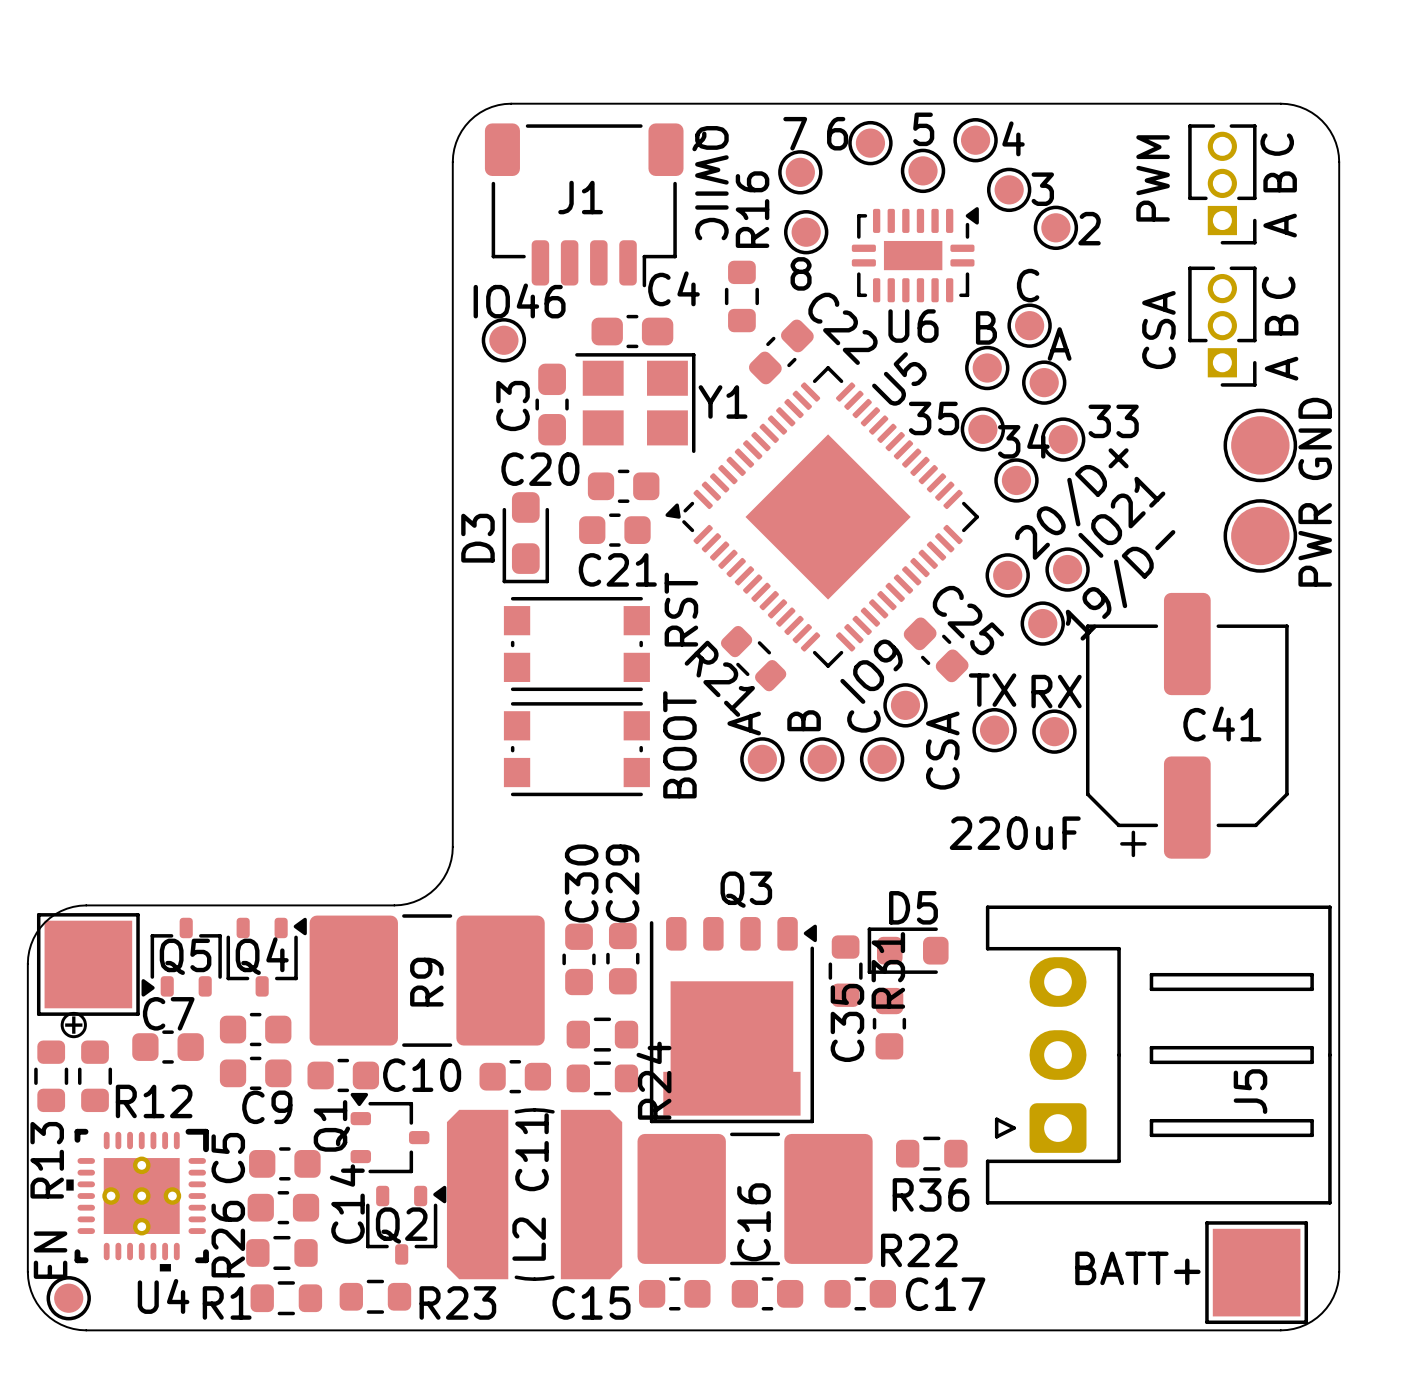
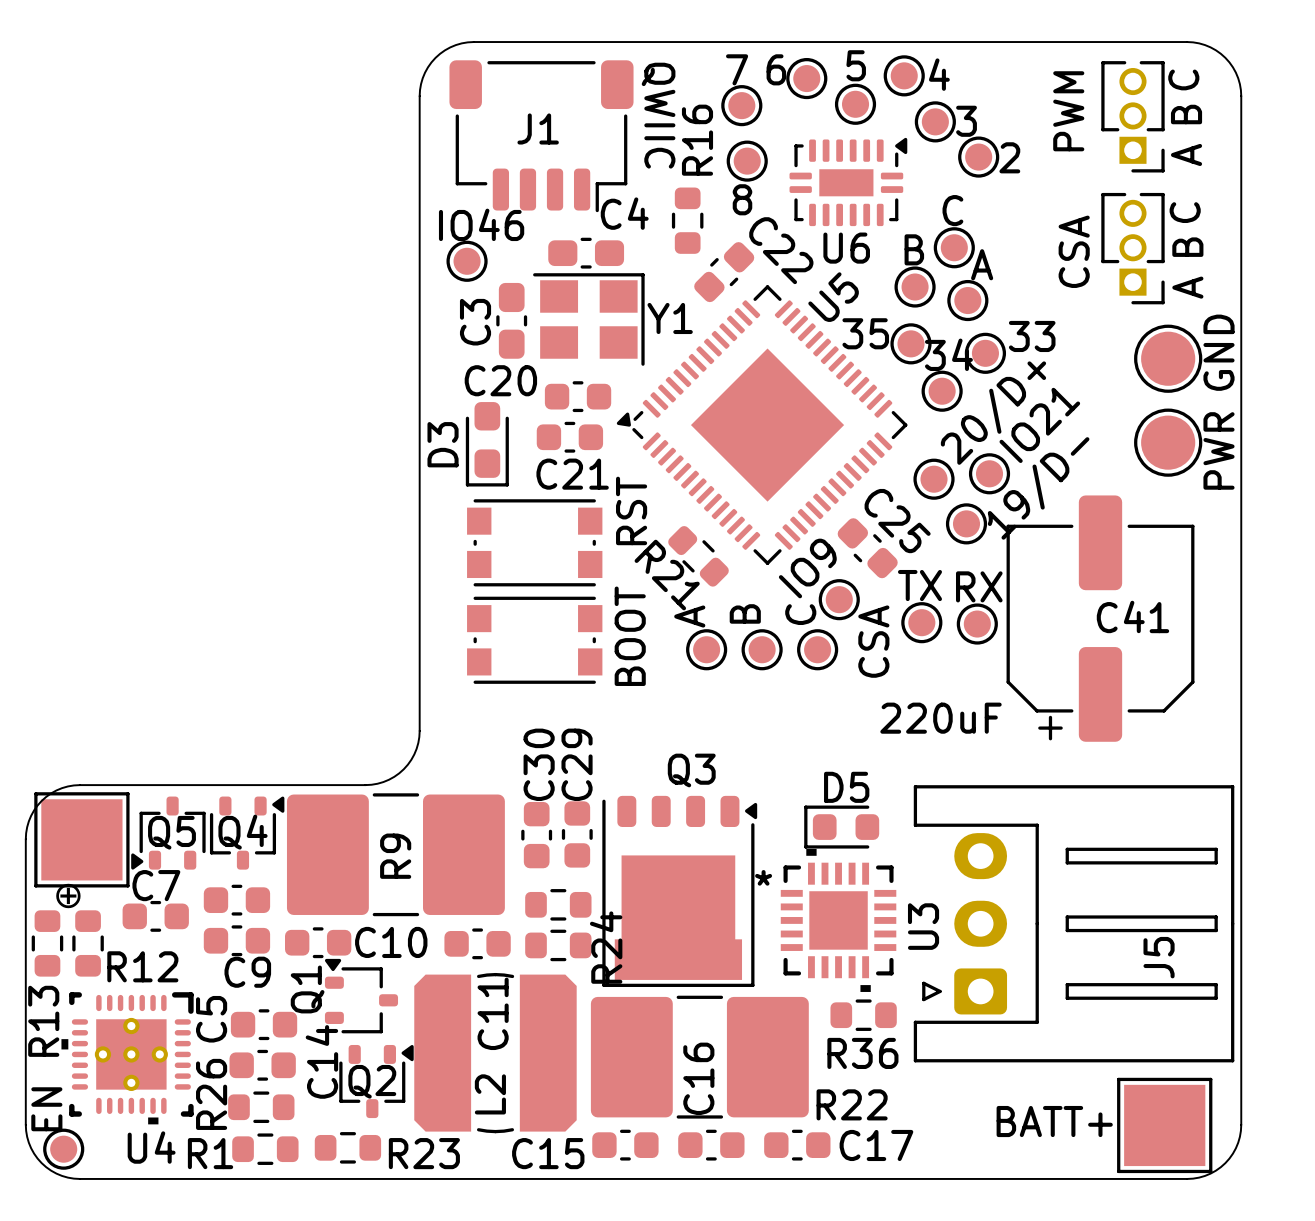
R31: (845, 971) -> none
C35: (889, 1023) -> none
U3: none -> (838, 920)

